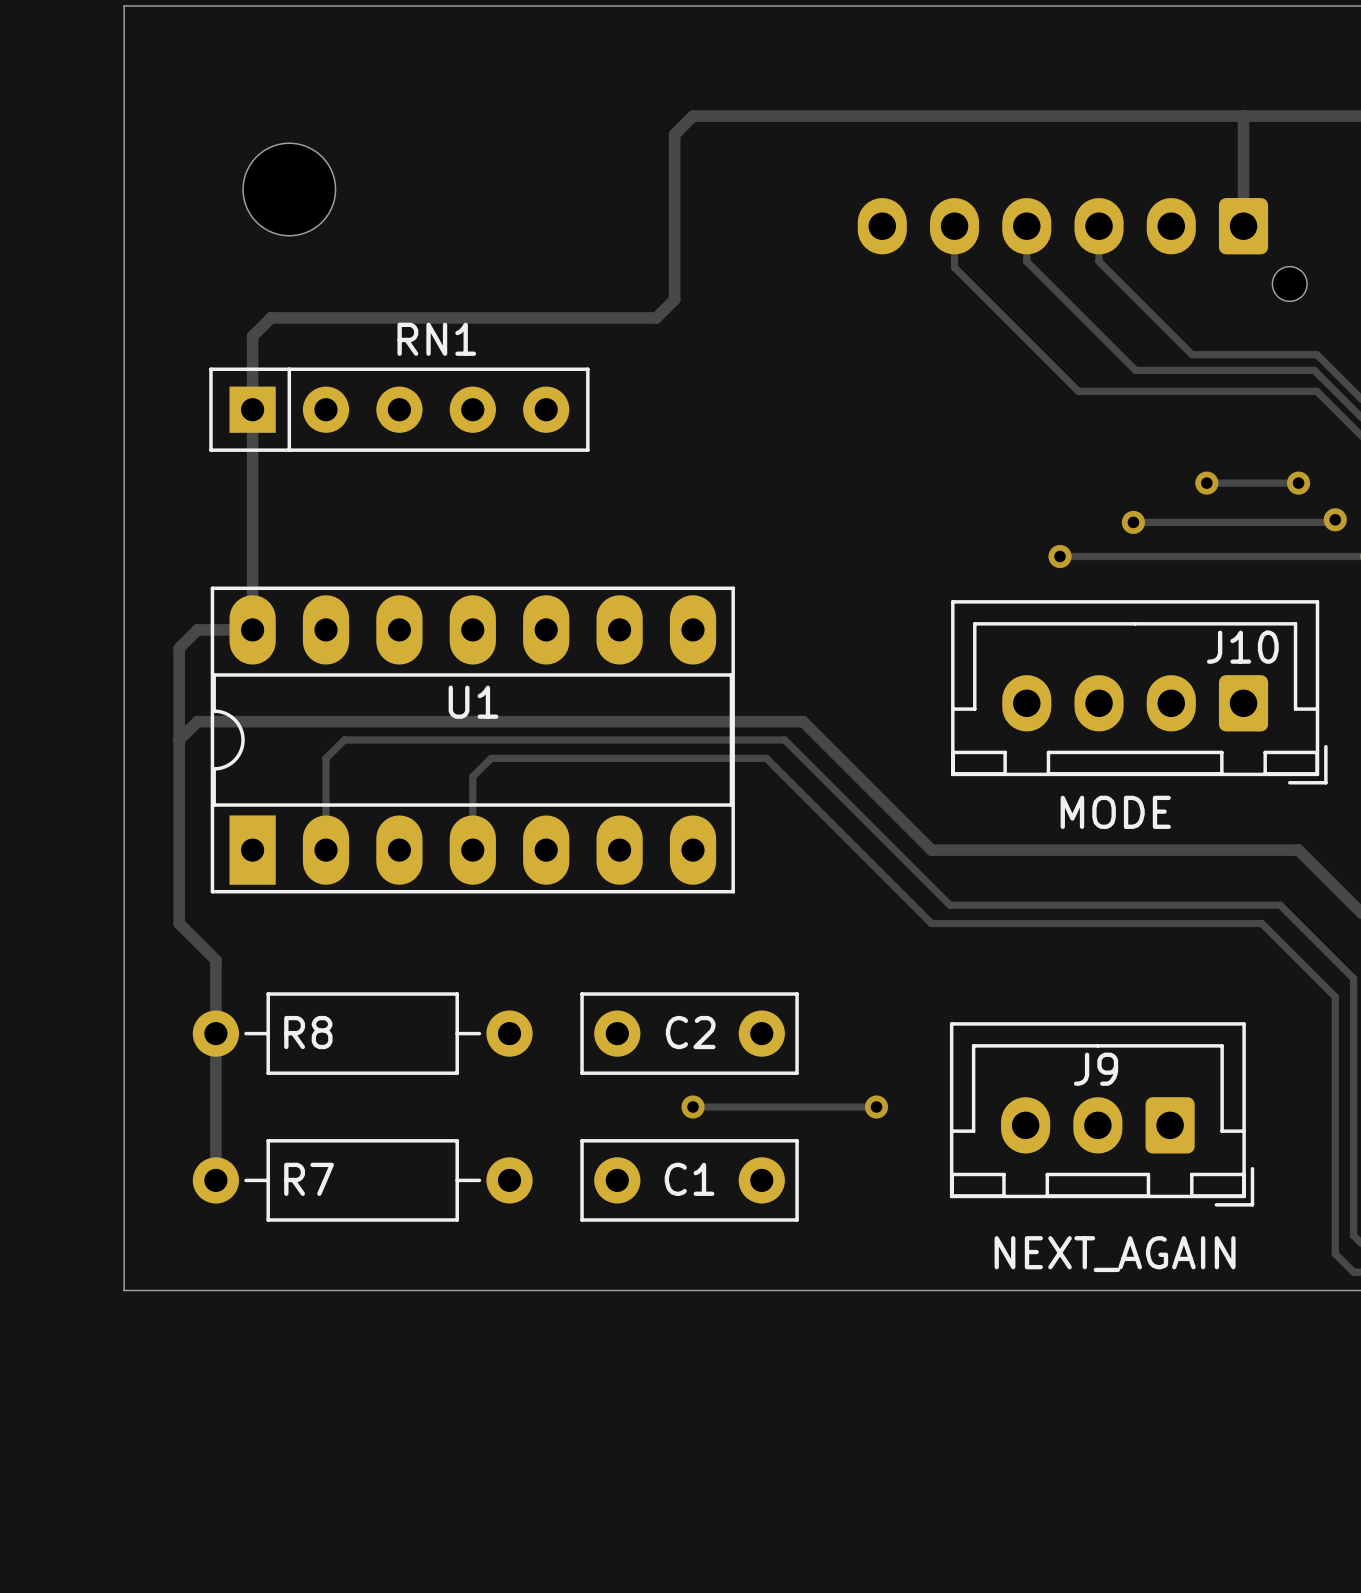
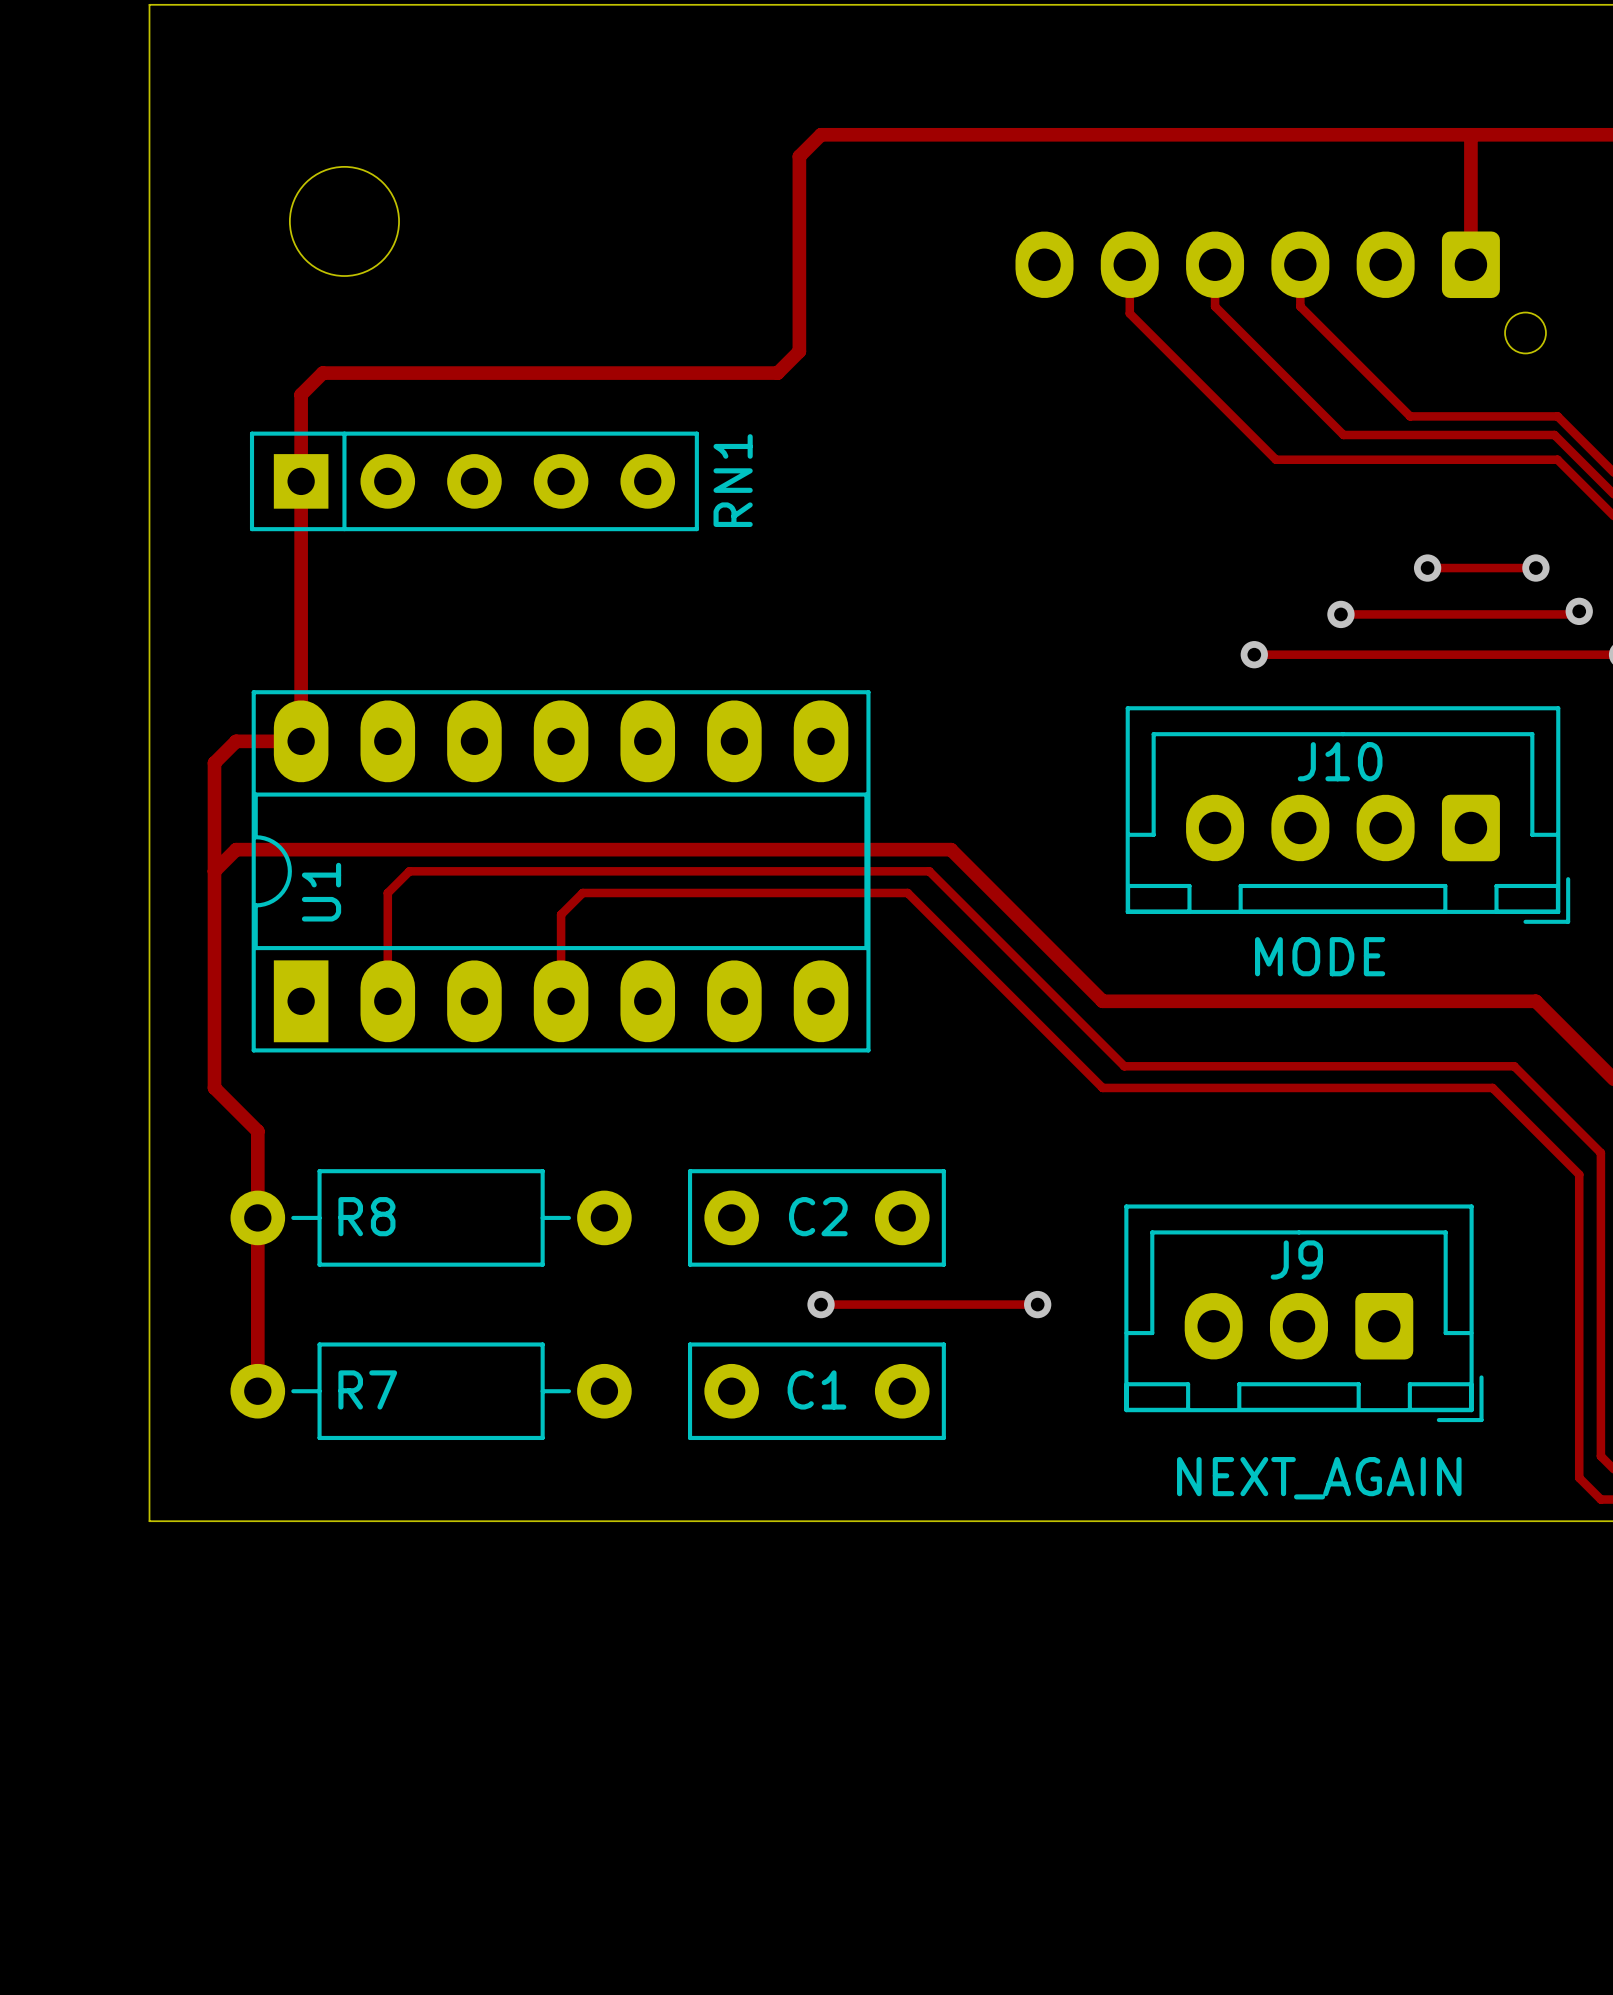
RN1 name rotation: 0° (436, 339) -> 90° counterclockwise (733, 480)
RN1 name position: RN1 (436, 339) -> RN1 (733, 480)
J10 name position: J10 (1242, 647) -> J10 (1340, 761)
U1 name rotation: 0° (473, 702) -> 90° counterclockwise (321, 892)
U1 name position: U1 (473, 702) -> U1 (321, 892)

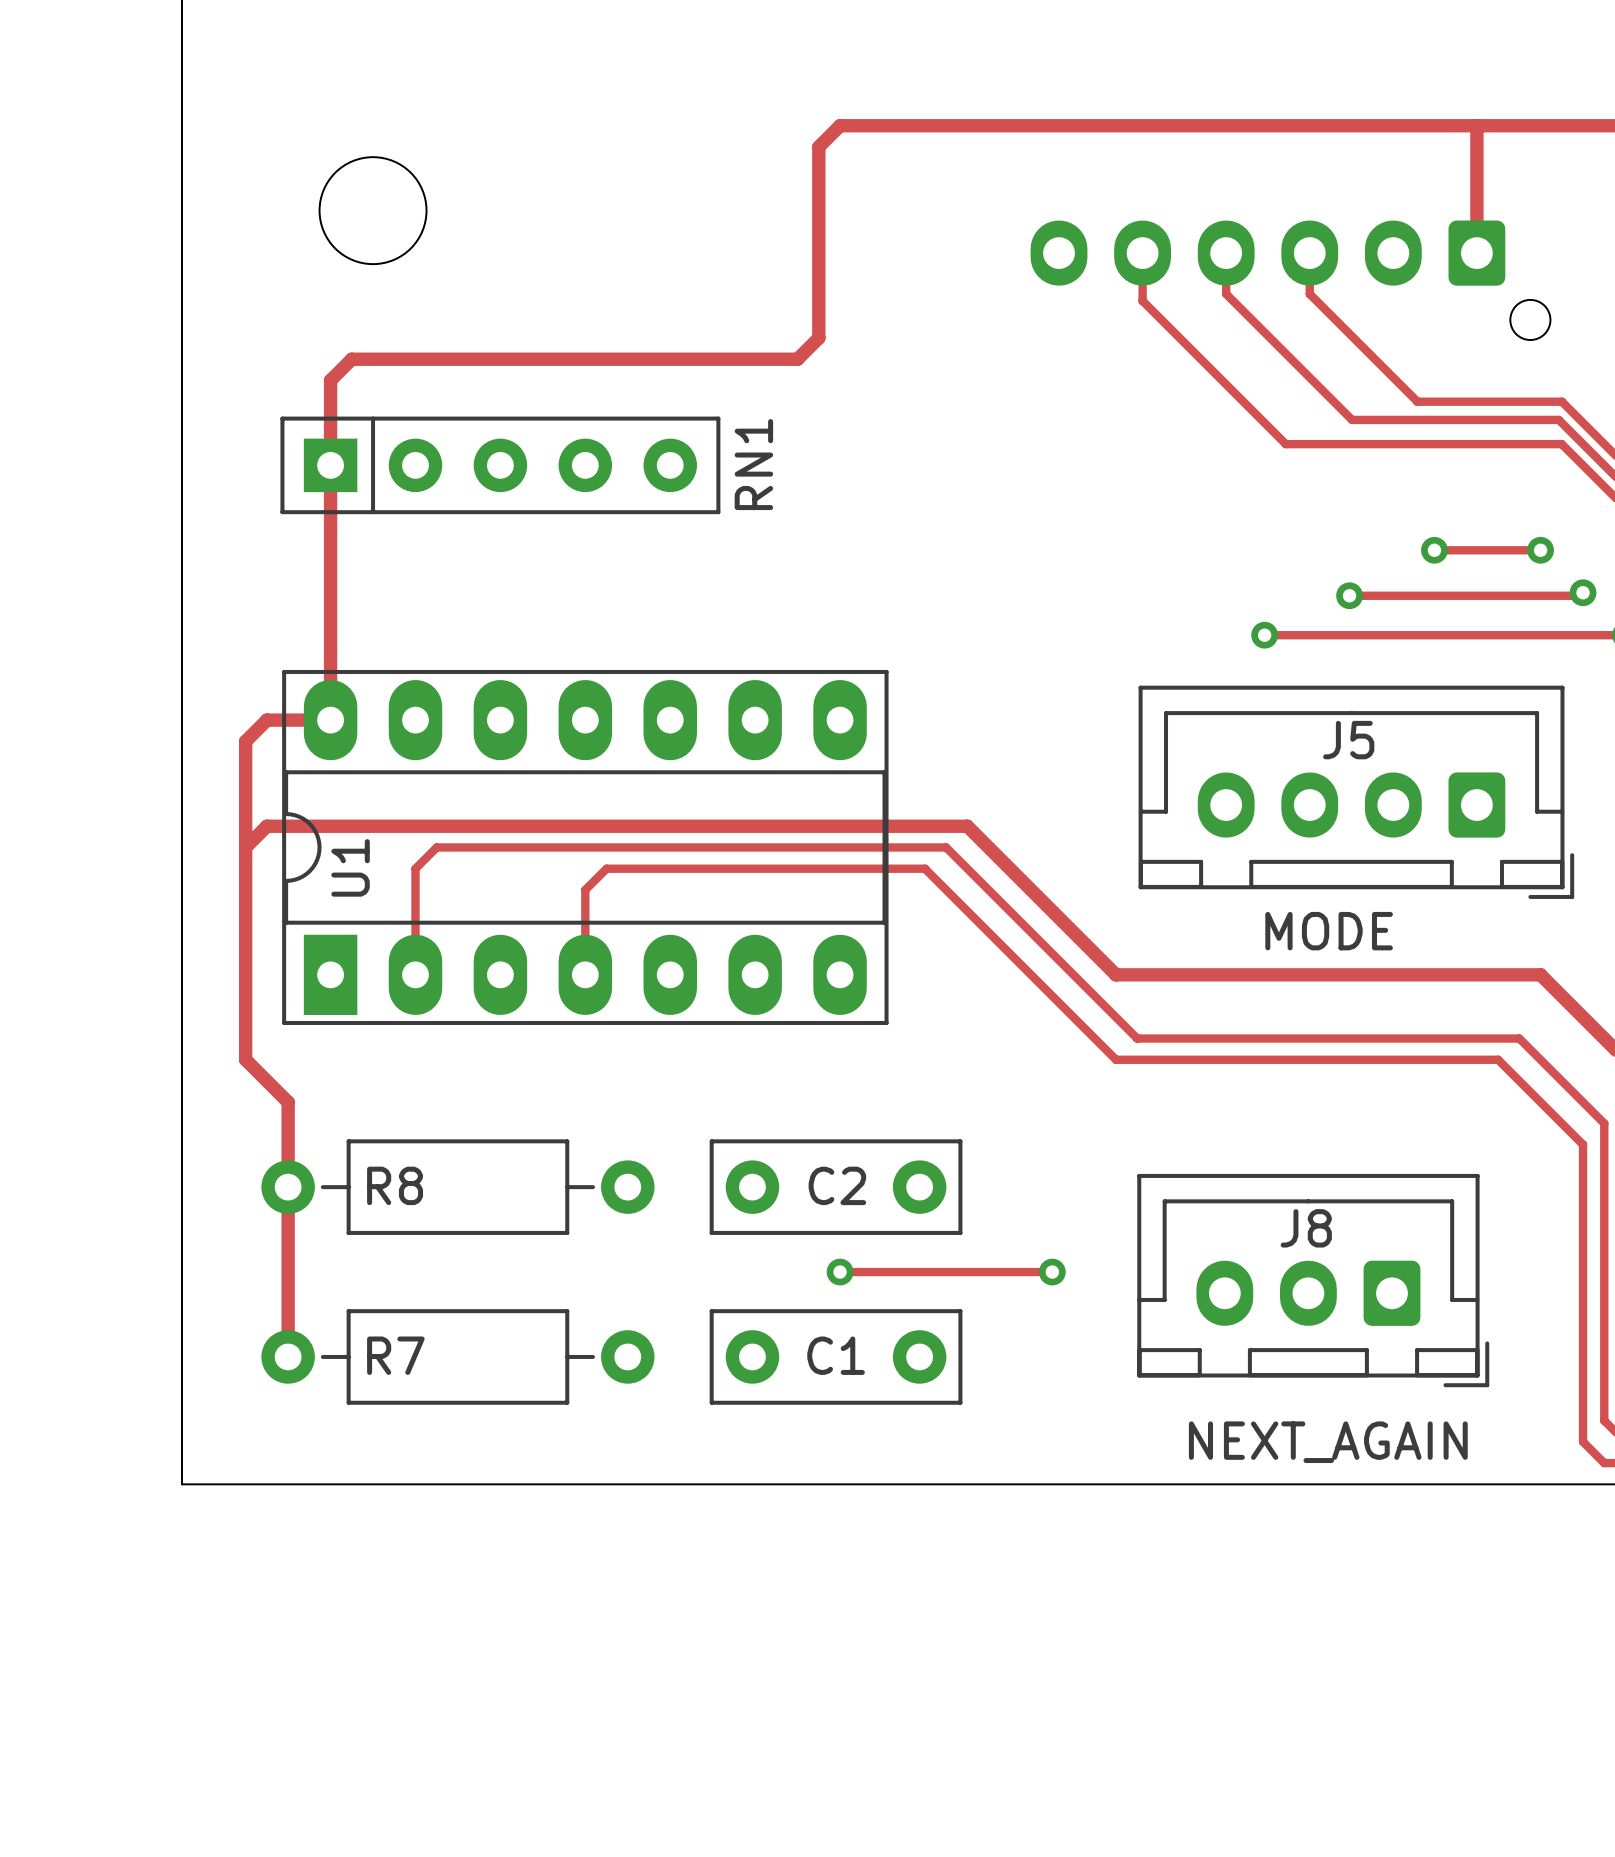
J10 name: J10 (1340, 761) -> J5 (1348, 740)
J9 name: J9 (1296, 1259) -> J8 (1306, 1228)

